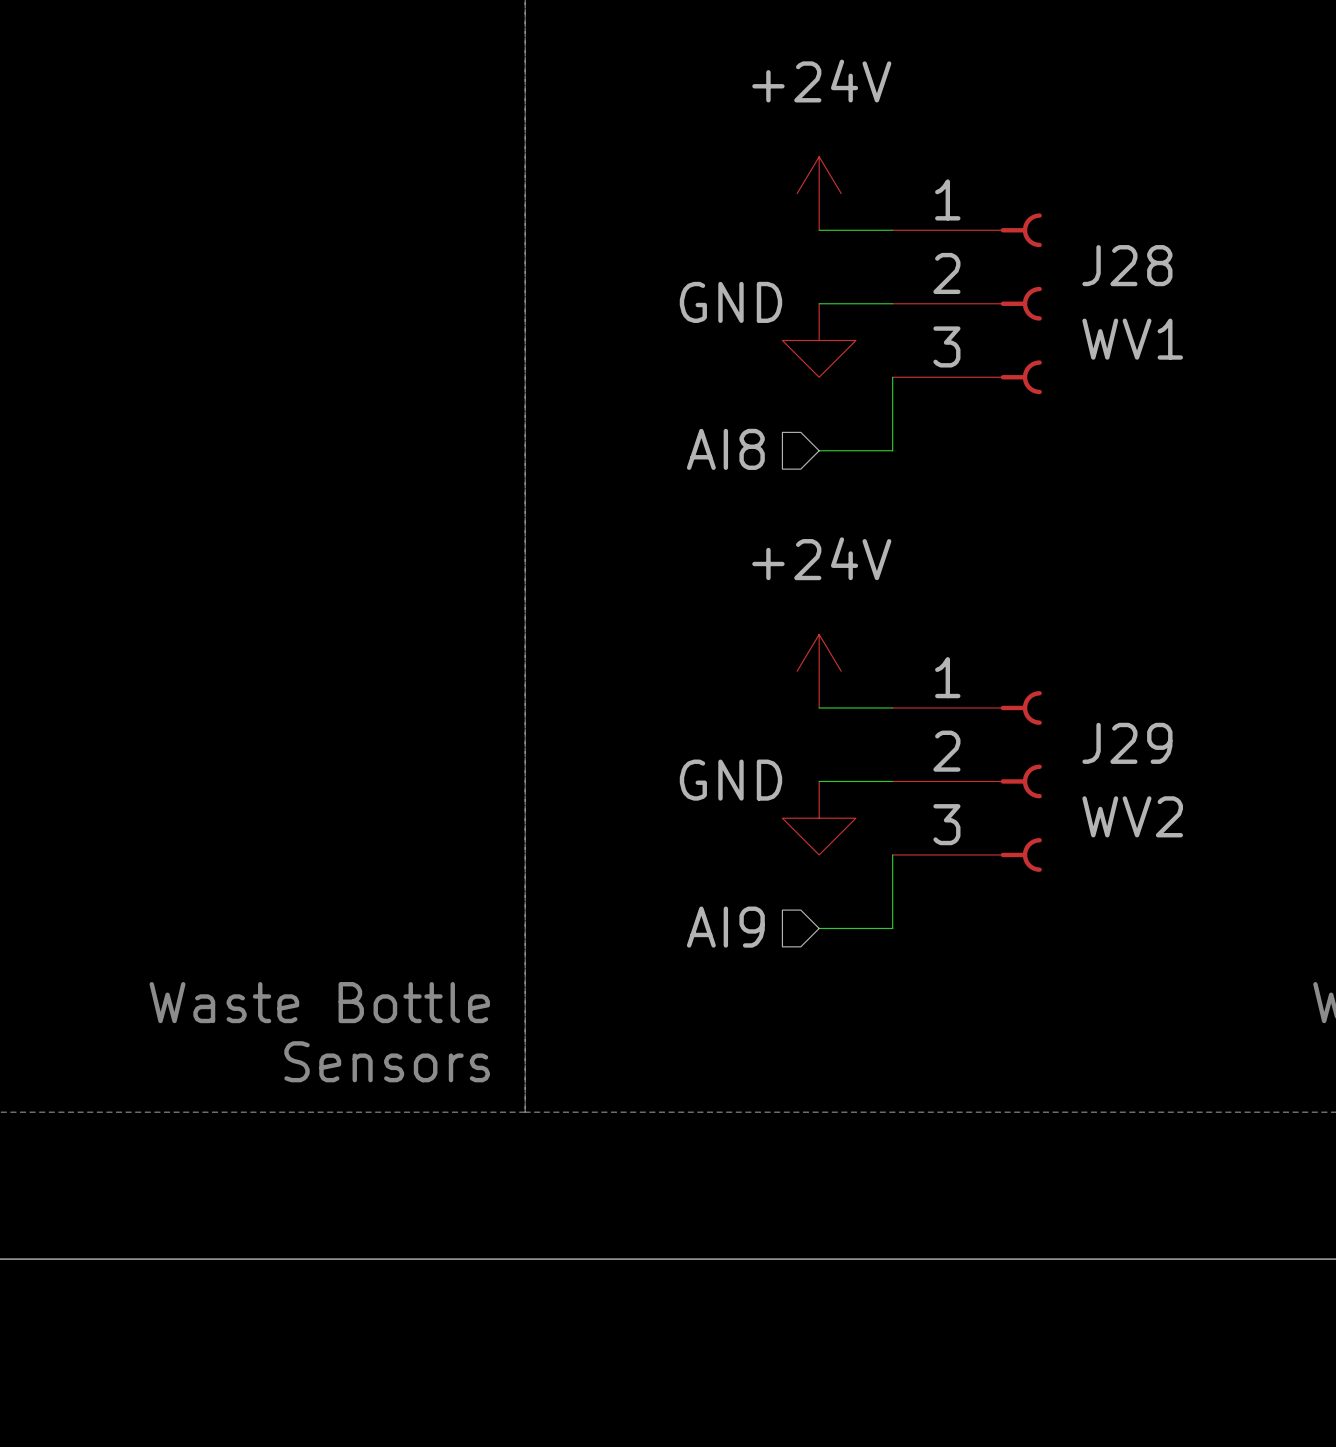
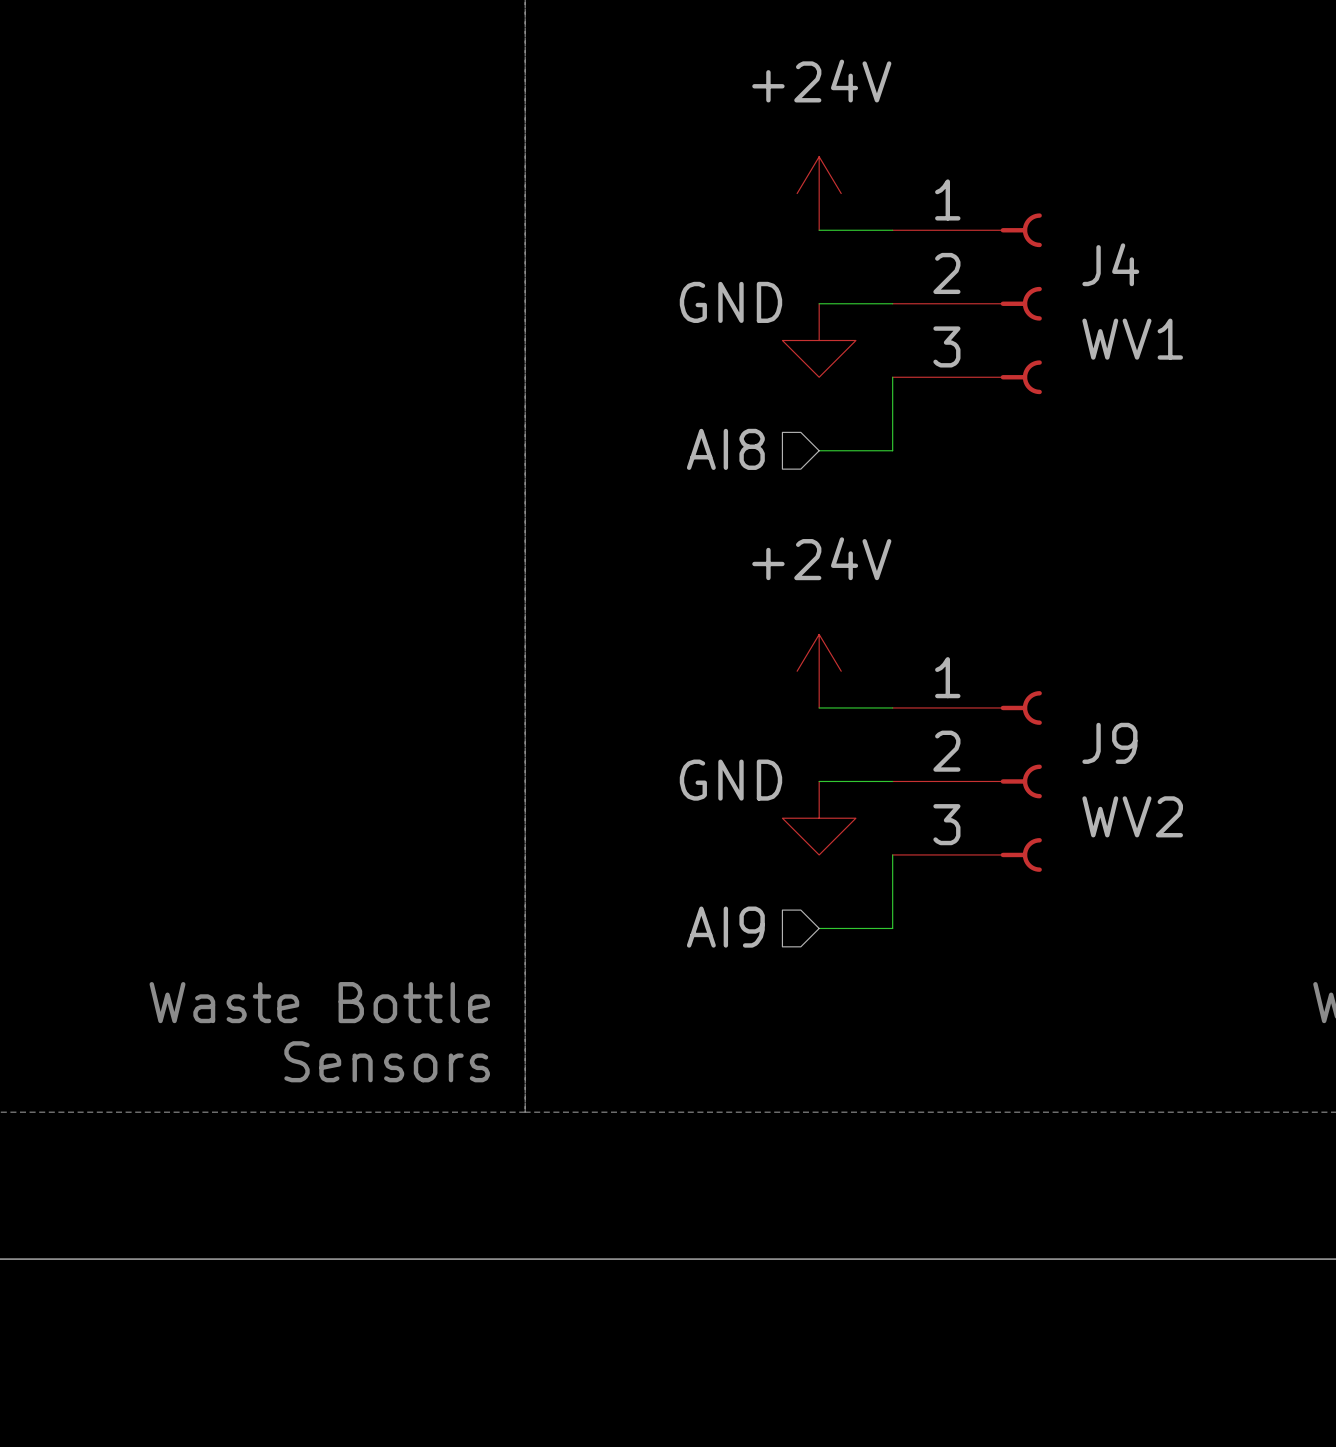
J28 name: J28 (1127, 265) -> J4 (1110, 264)
J29 name: J29 (1127, 743) -> J9 (1109, 743)

